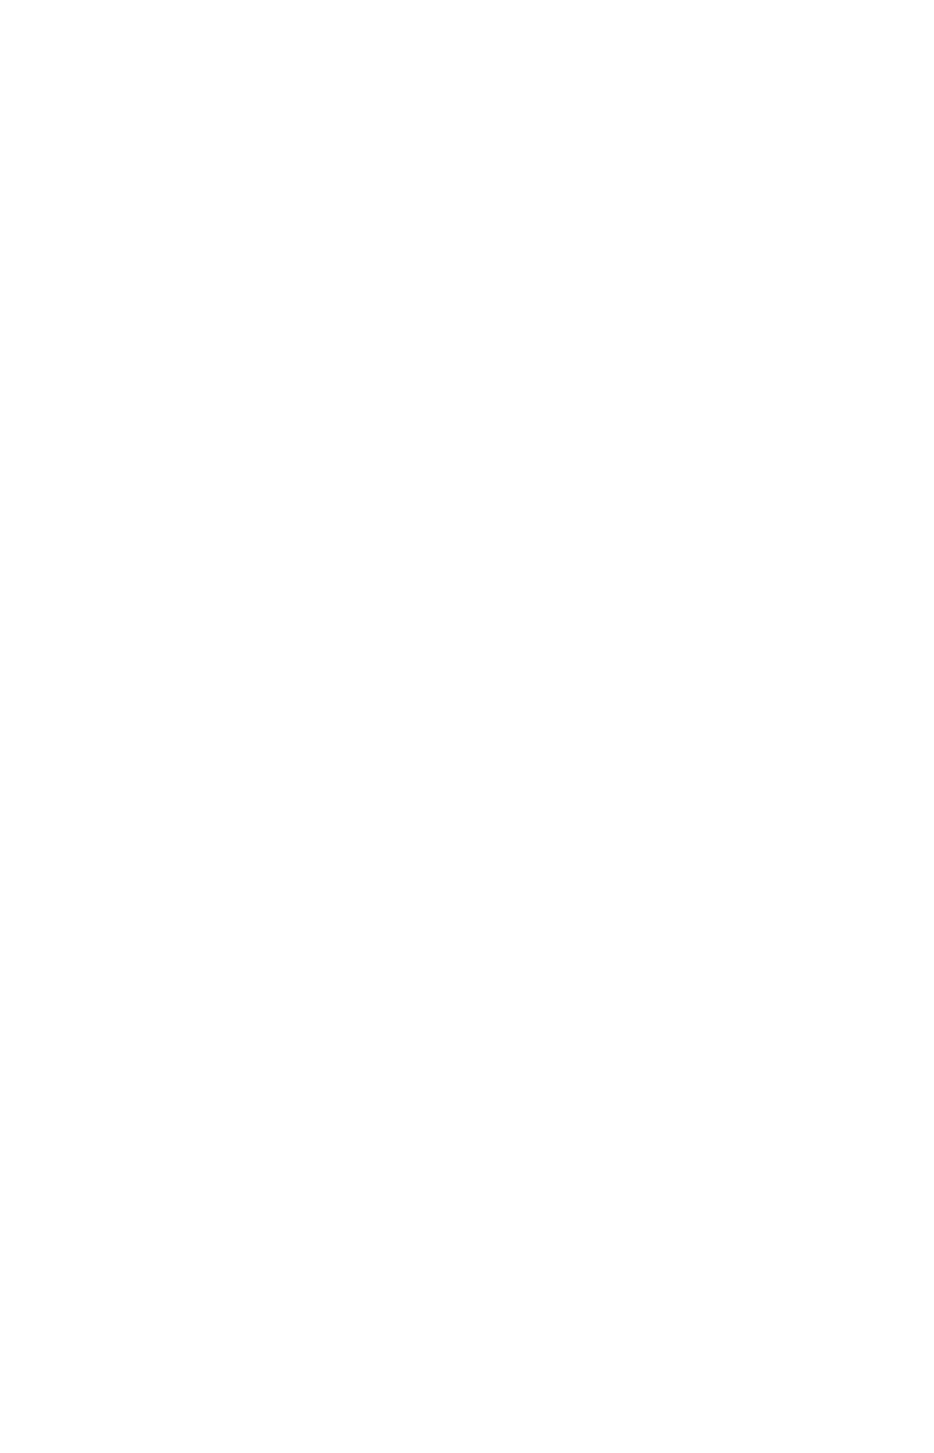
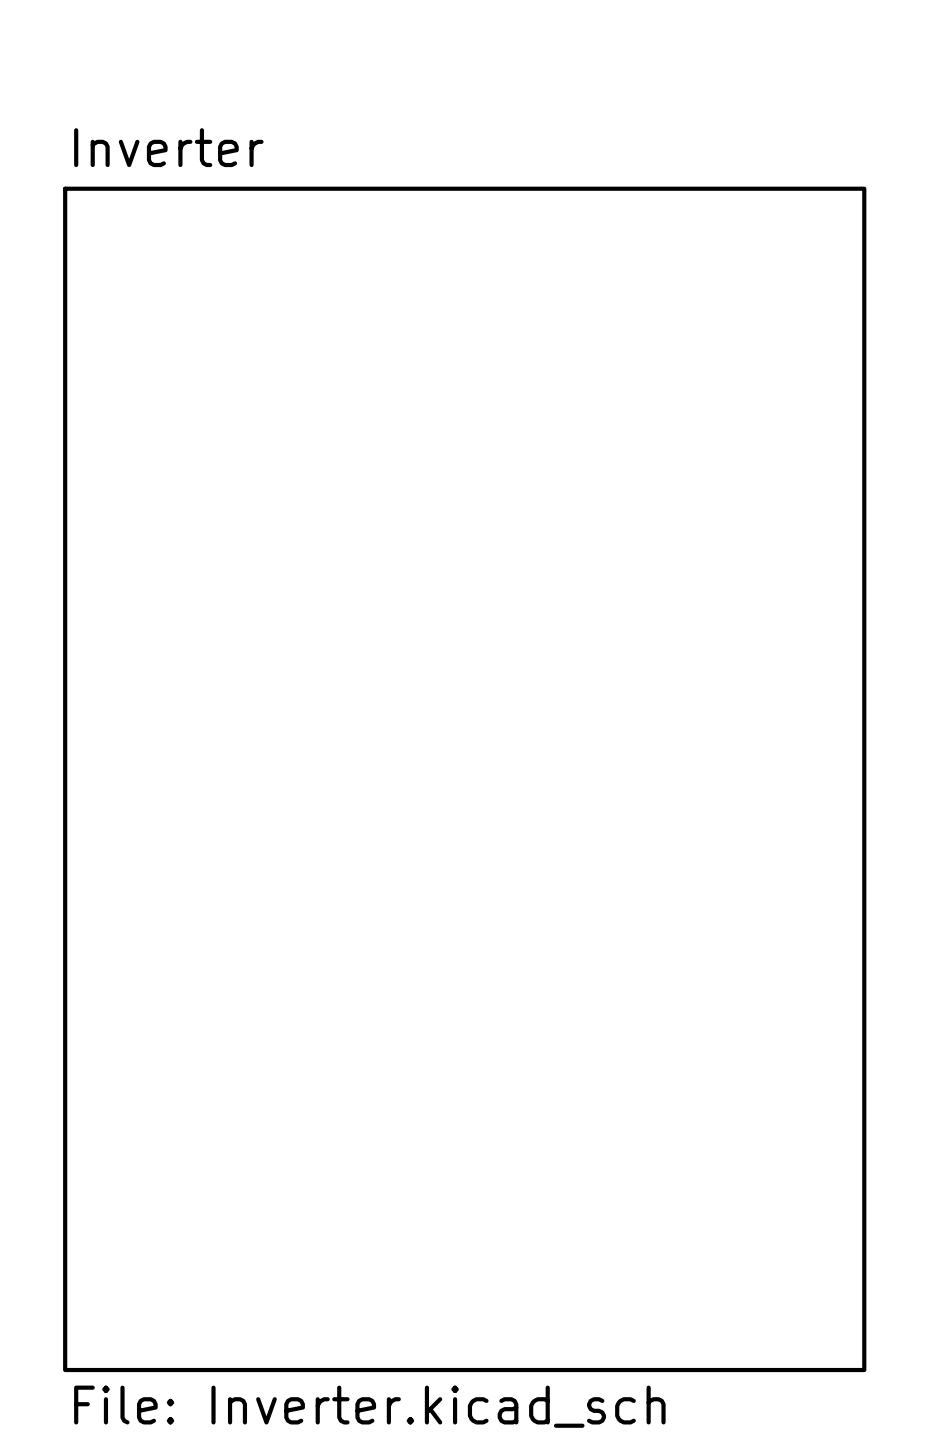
sheet Inverter: none -> File: Inverter.kicad_sch (464, 779)

